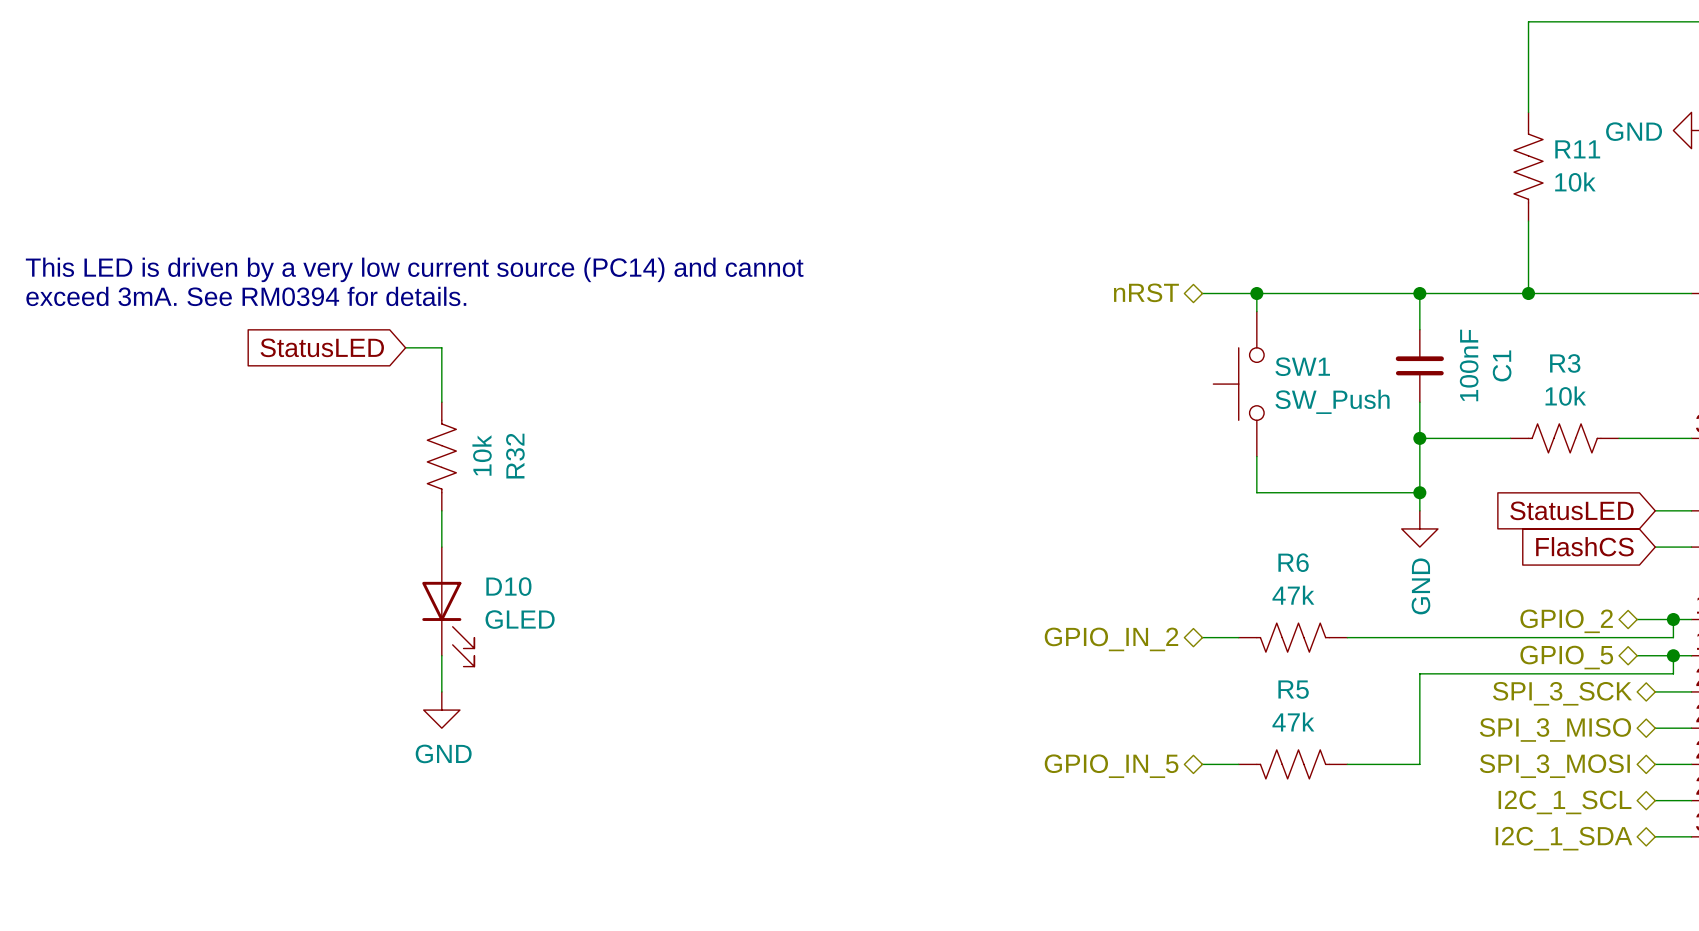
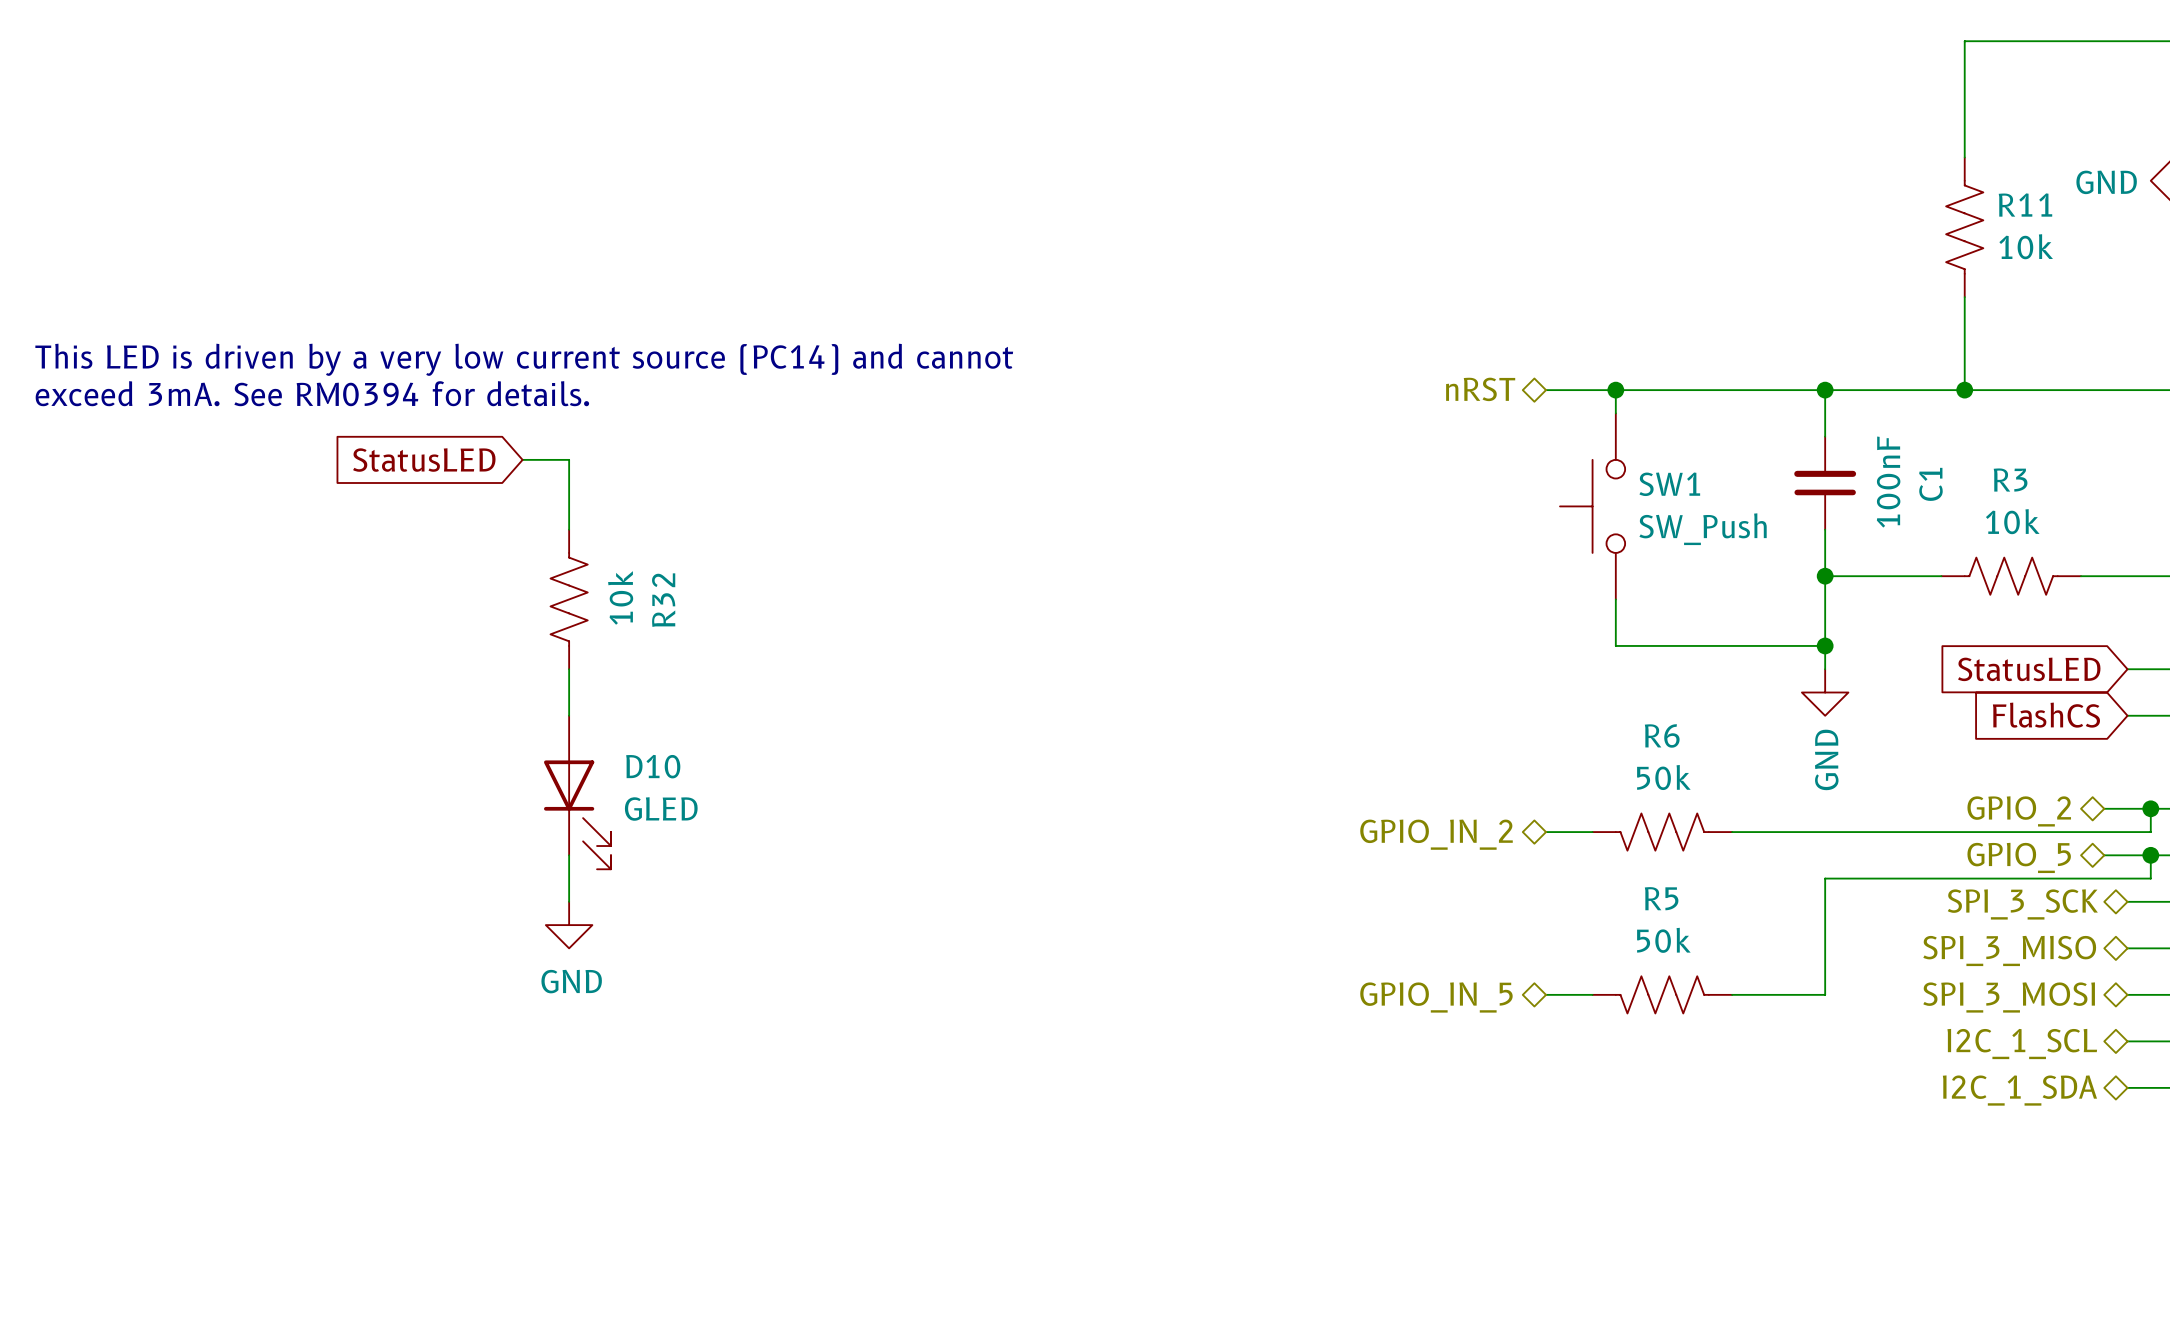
R6 value: 47k (1293, 595) -> 50k (1663, 777)
R5 value: 47k (1293, 721) -> 50k (1663, 940)

